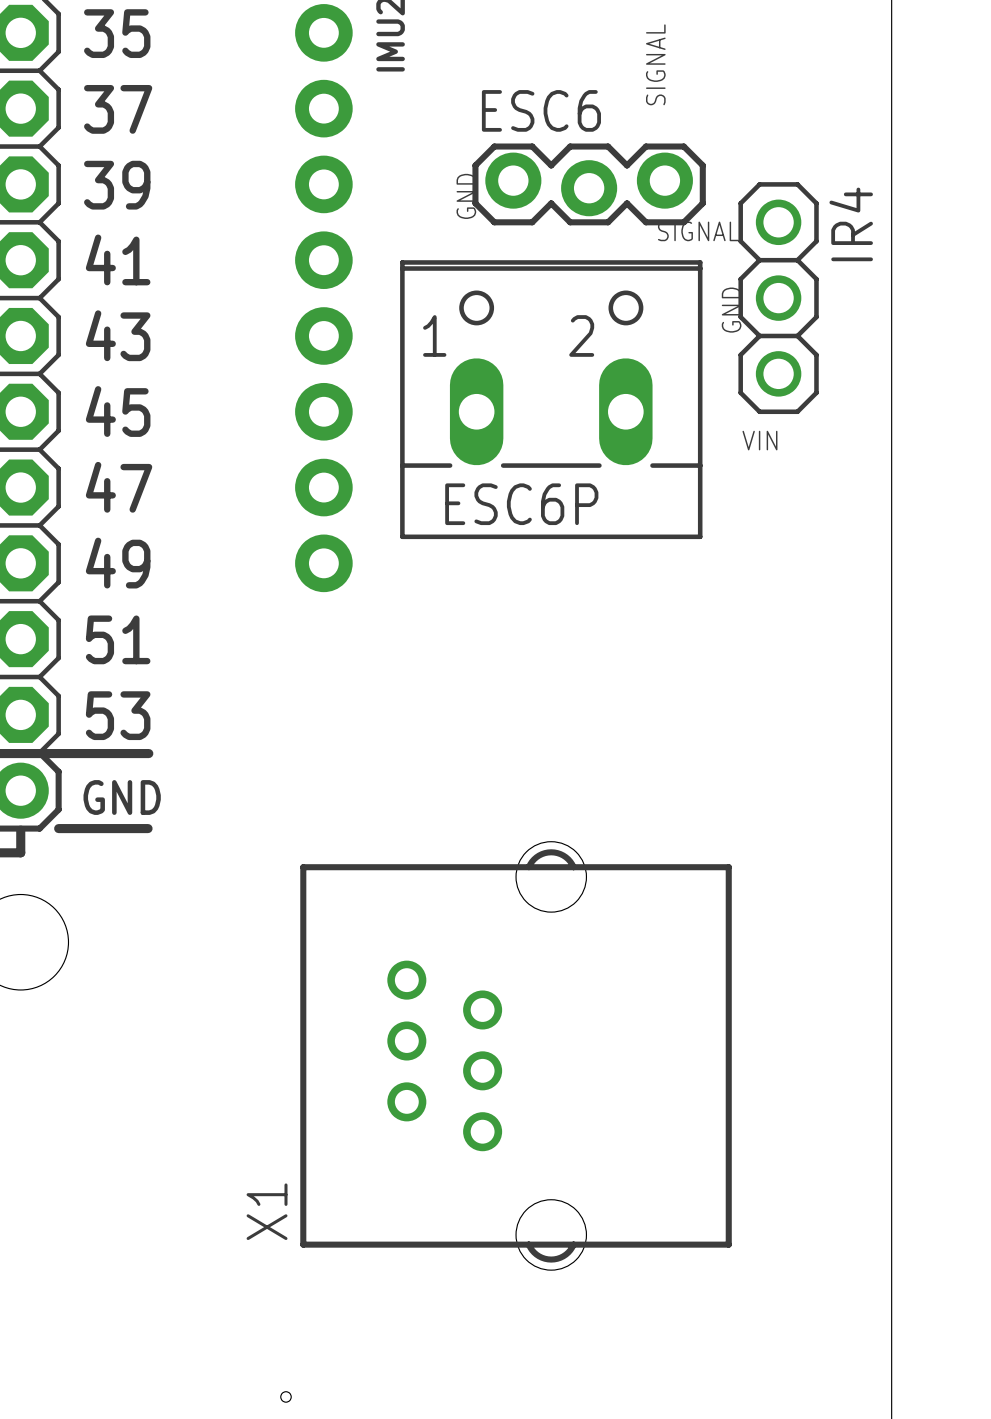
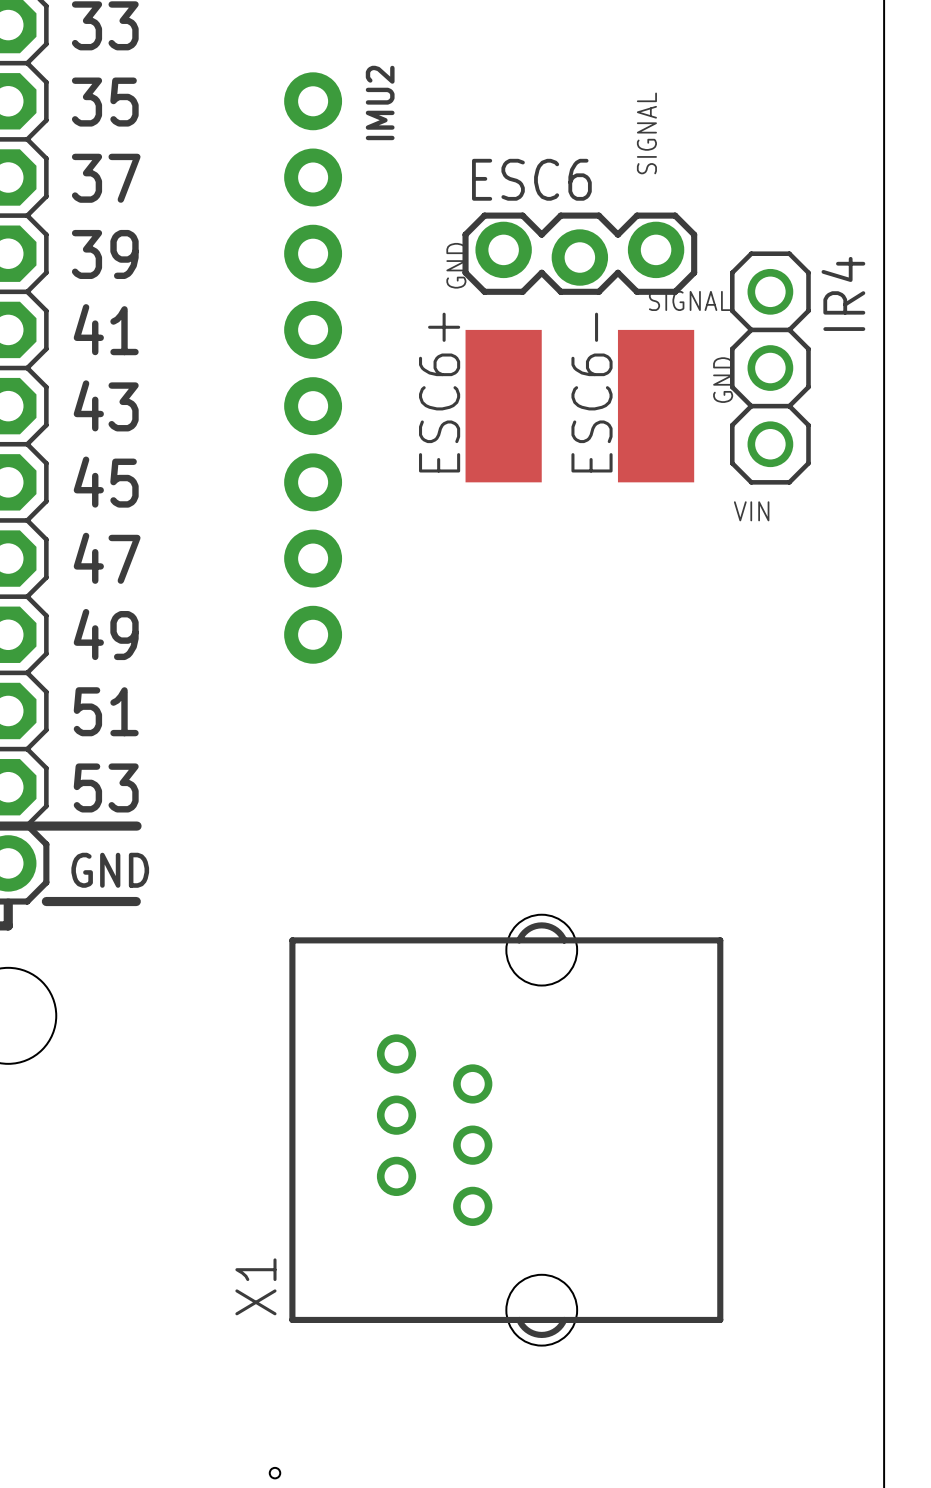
ESC6+: none -> (503, 406)
ESC6-: none -> (656, 406)
ESC6P: (551, 399) -> none

